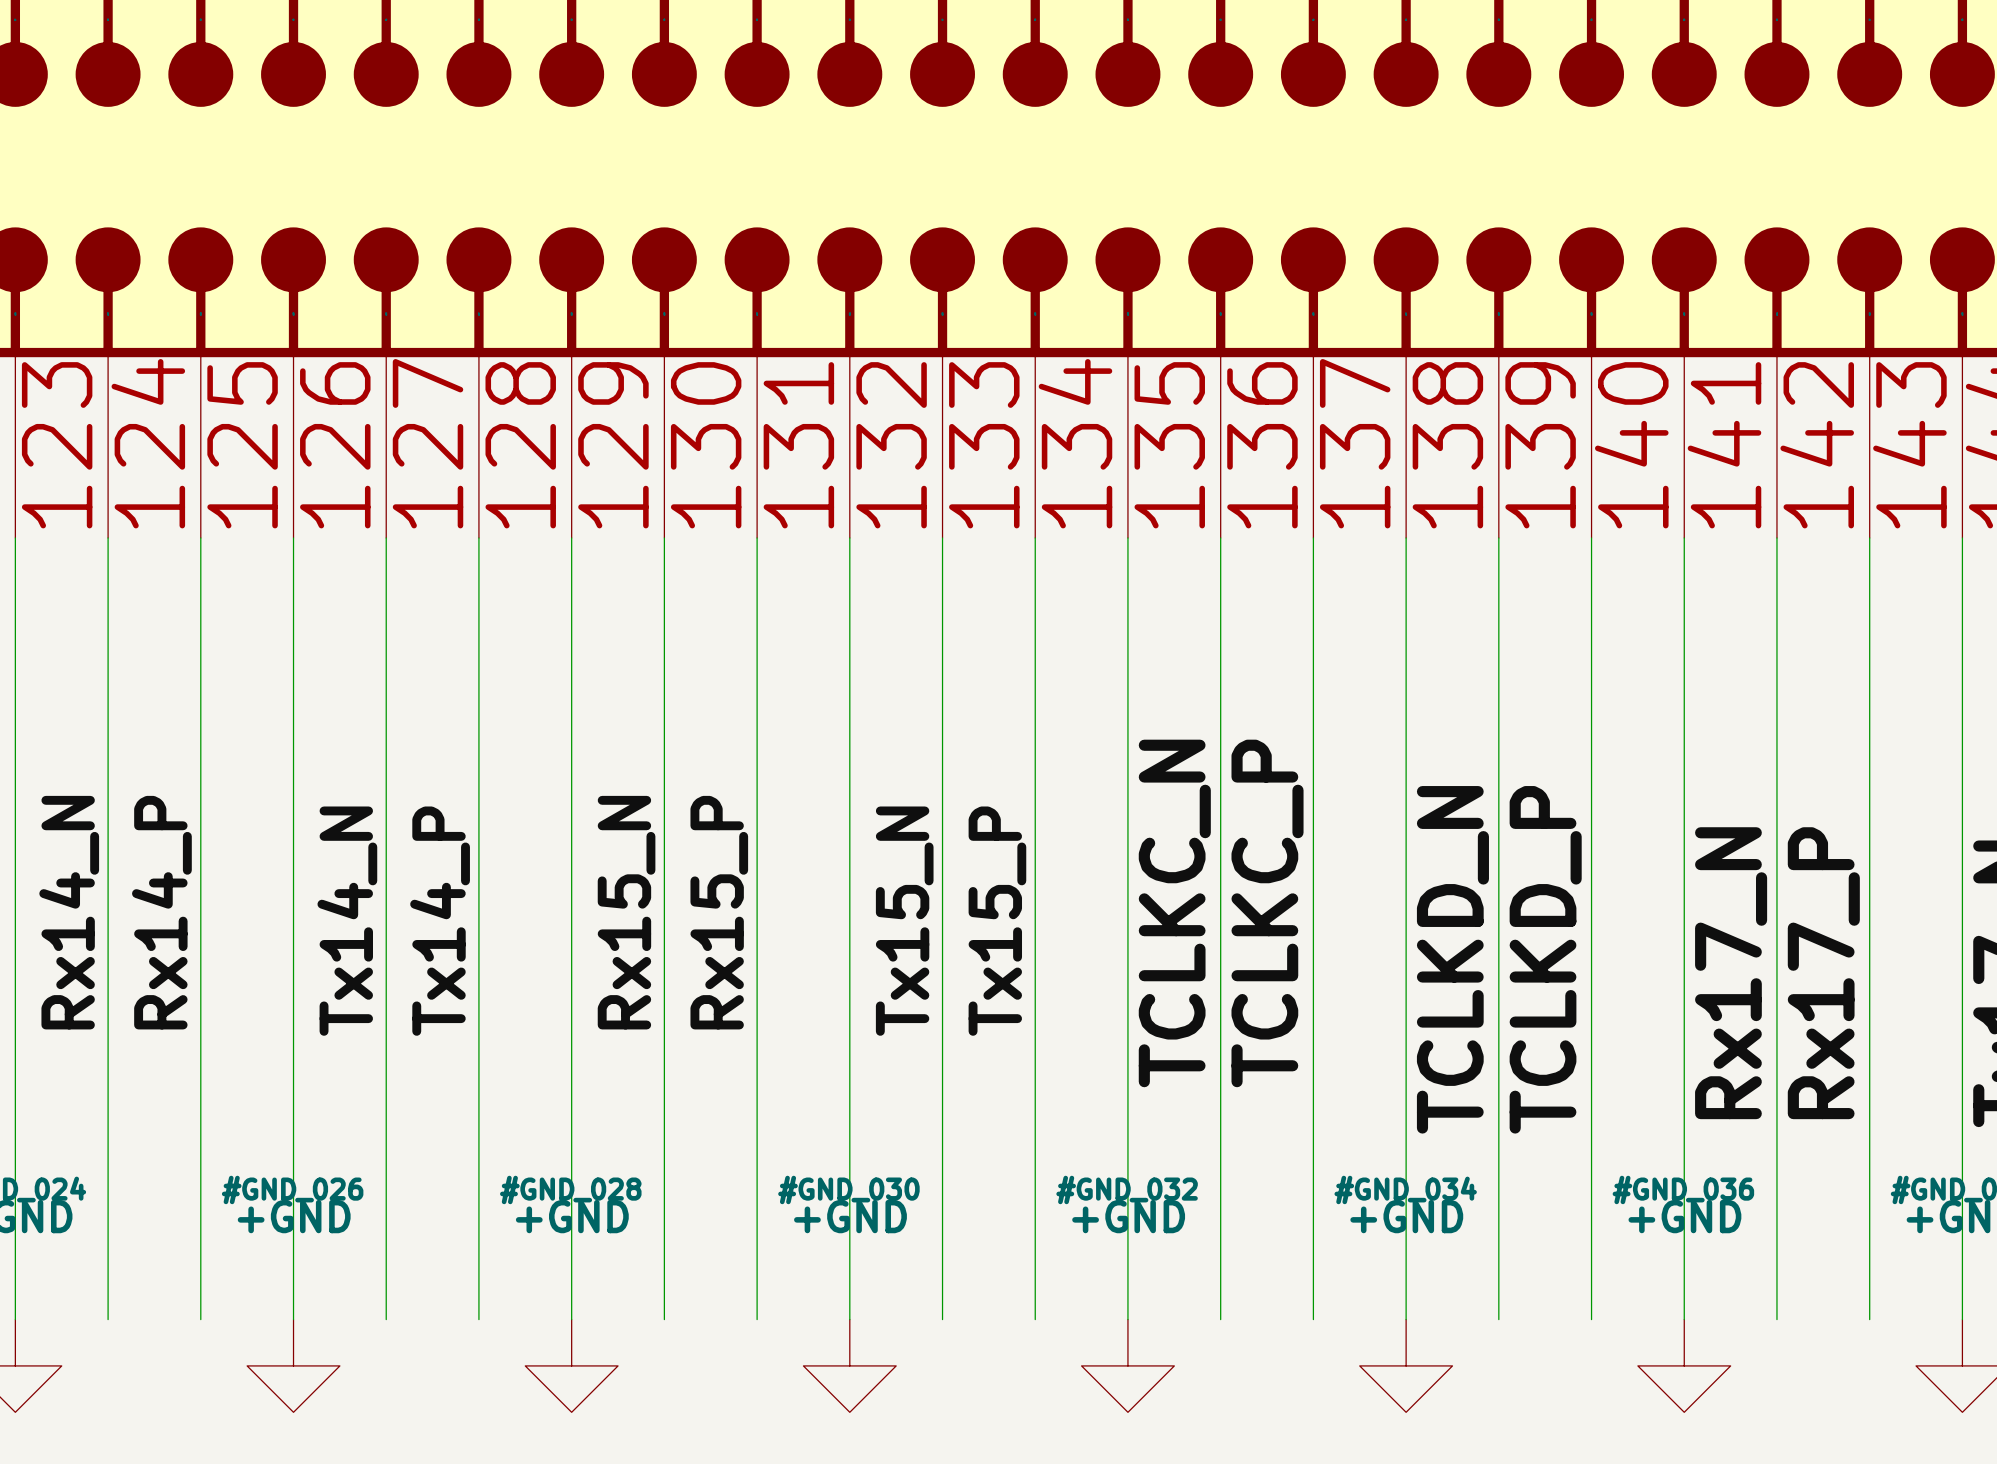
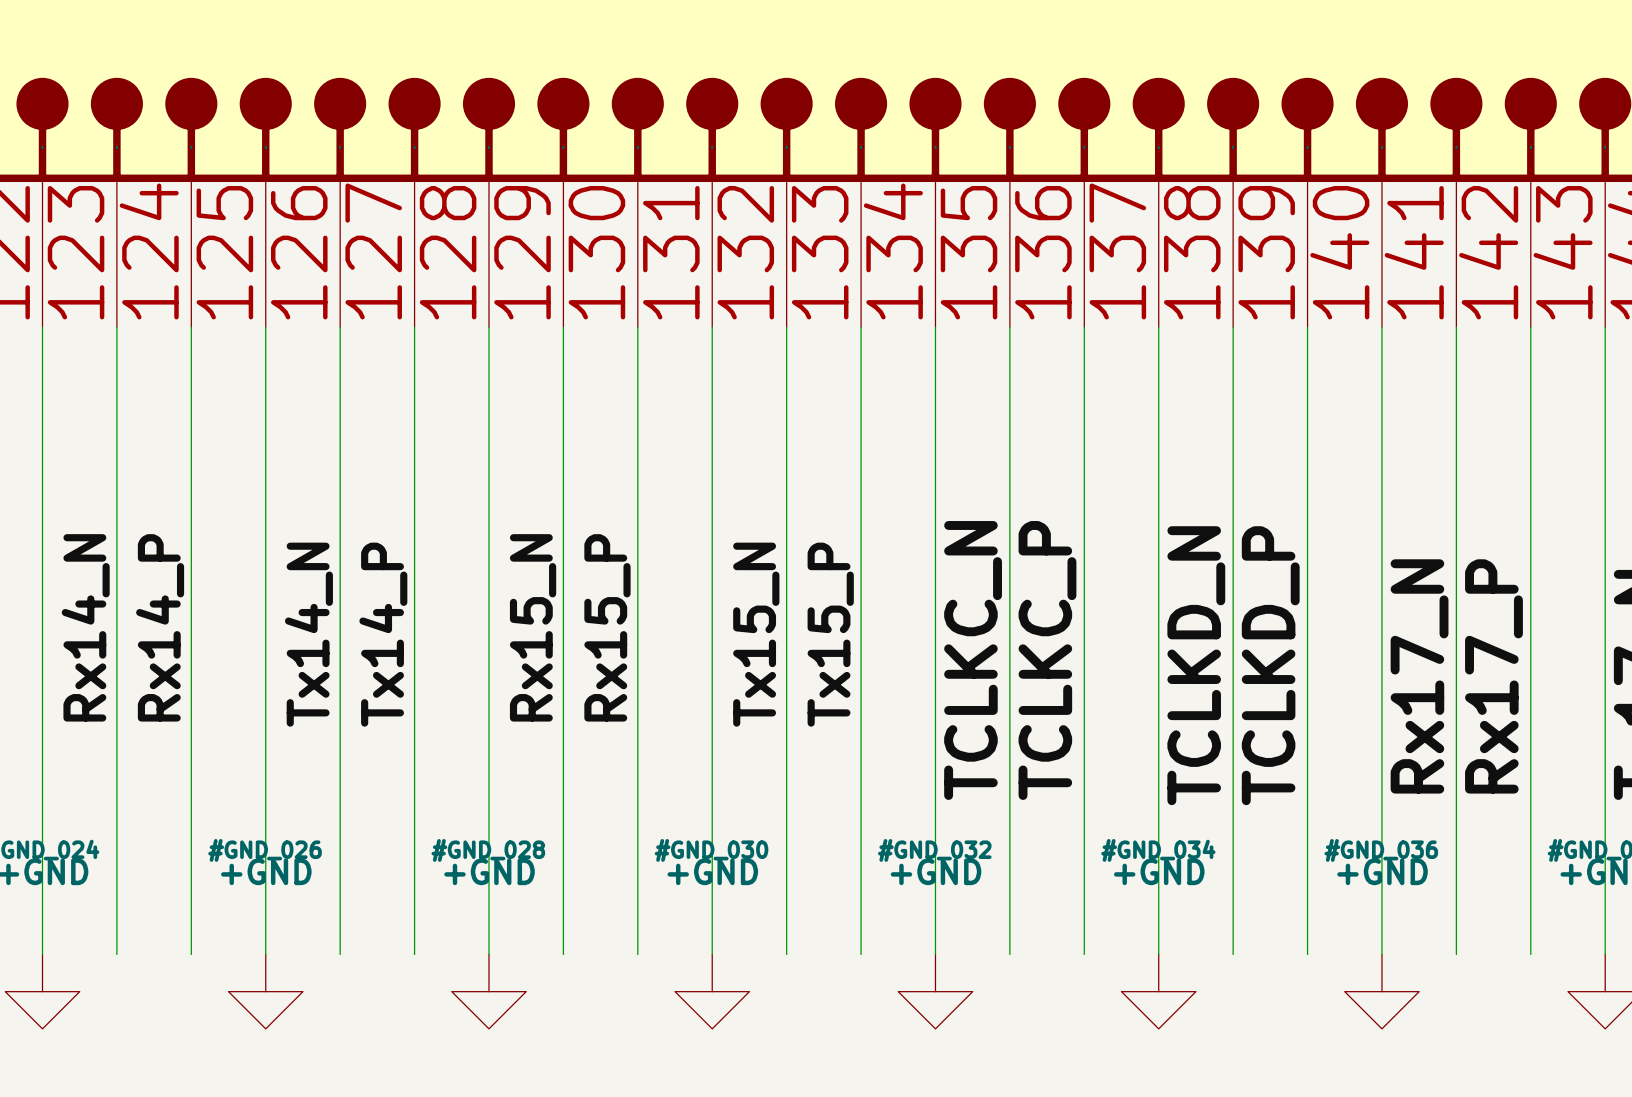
label position: TCLKC_N (1174, 913) -> TCLKC_N (973, 660)
label position: TCLKC_P (1267, 913) -> TCLKC_P (1047, 660)

